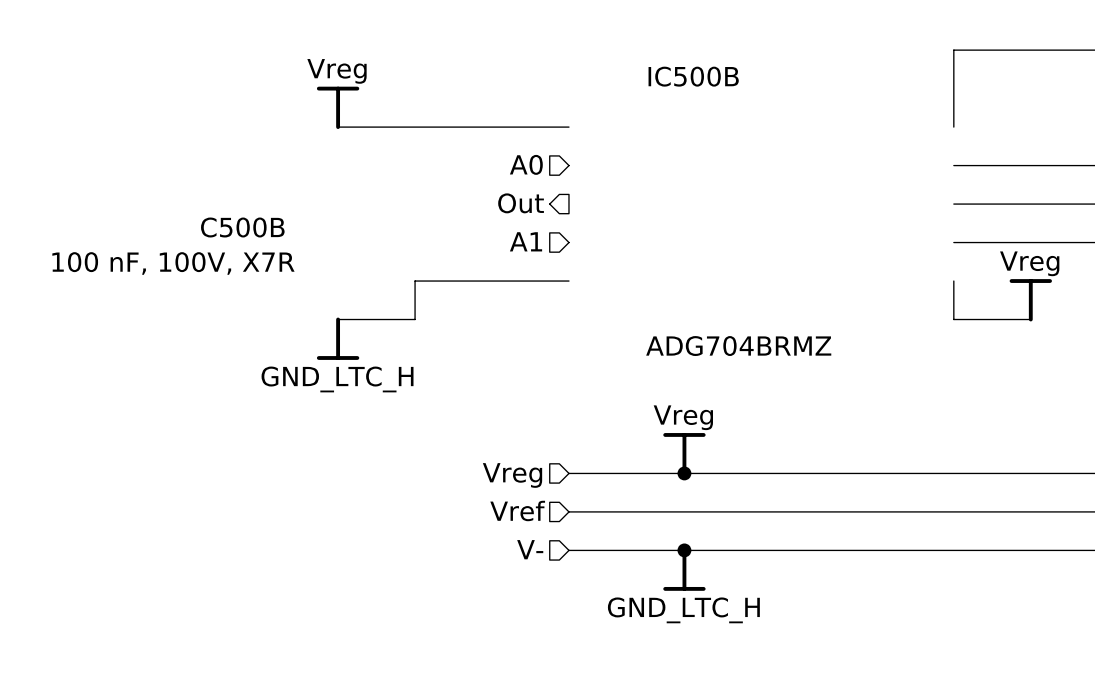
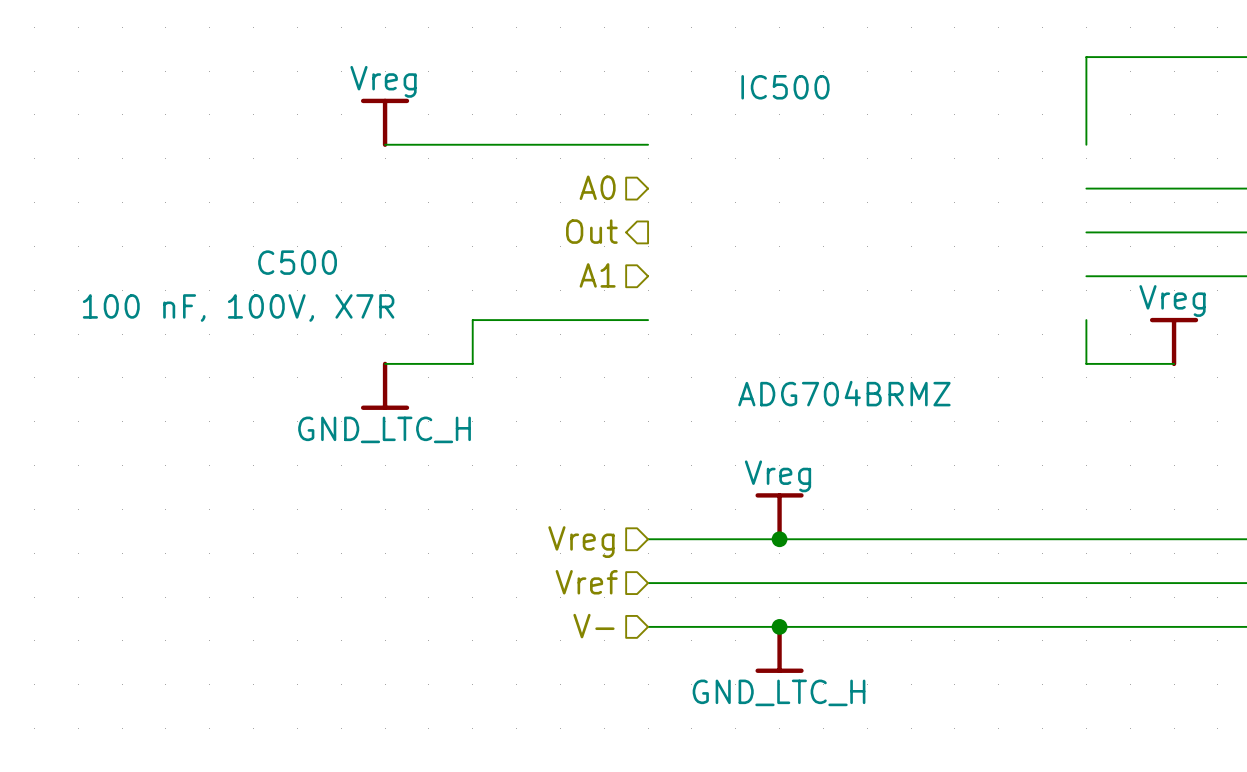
IC500B name: IC500B (693, 76) -> IC500 (785, 87)
C500B: 100 nF, 100V, X7R (173, 246) -> none
C500: none -> 100 nF, 100V, X7R (238, 286)

